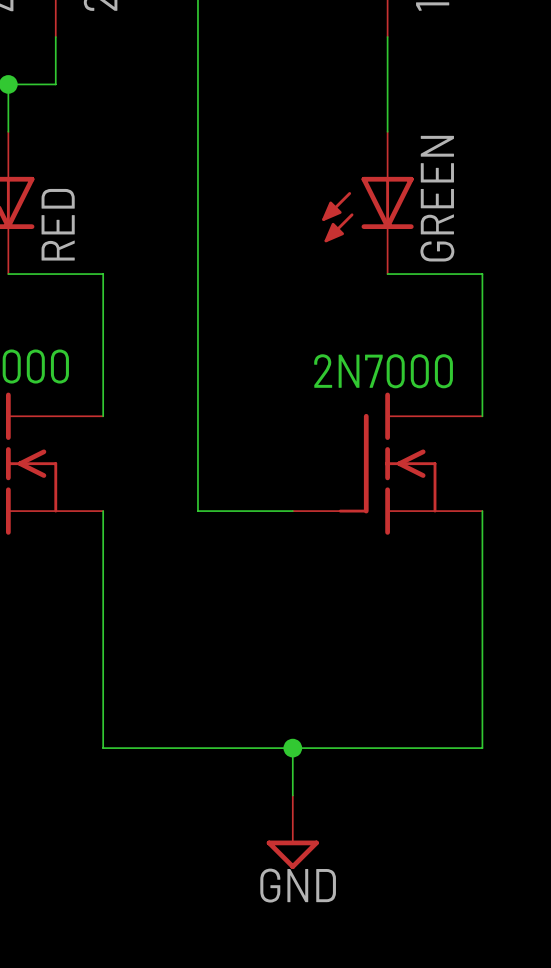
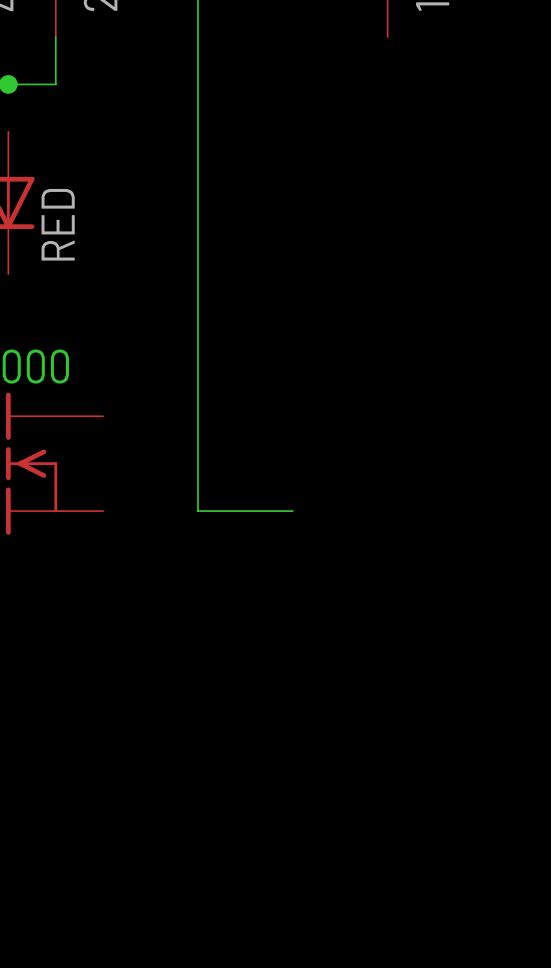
wire: (387, 37) (387, 131) -> none
wire: (8, 84) (8, 131) -> none
GREEN: (367, 202) -> none
wire: (8, 274) (103, 274) (103, 416) -> none
wire: (387, 274) (482, 274) (482, 416) -> none
text: 2N7000 (383, 371) -> none
part: (387, 463) -> none
wire: (103, 511) (103, 748) (482, 748) (482, 511) -> none
wire: (292, 748) (292, 795) -> none
junction: (292, 748) -> none
power symbol: GND (292, 832) -> none

